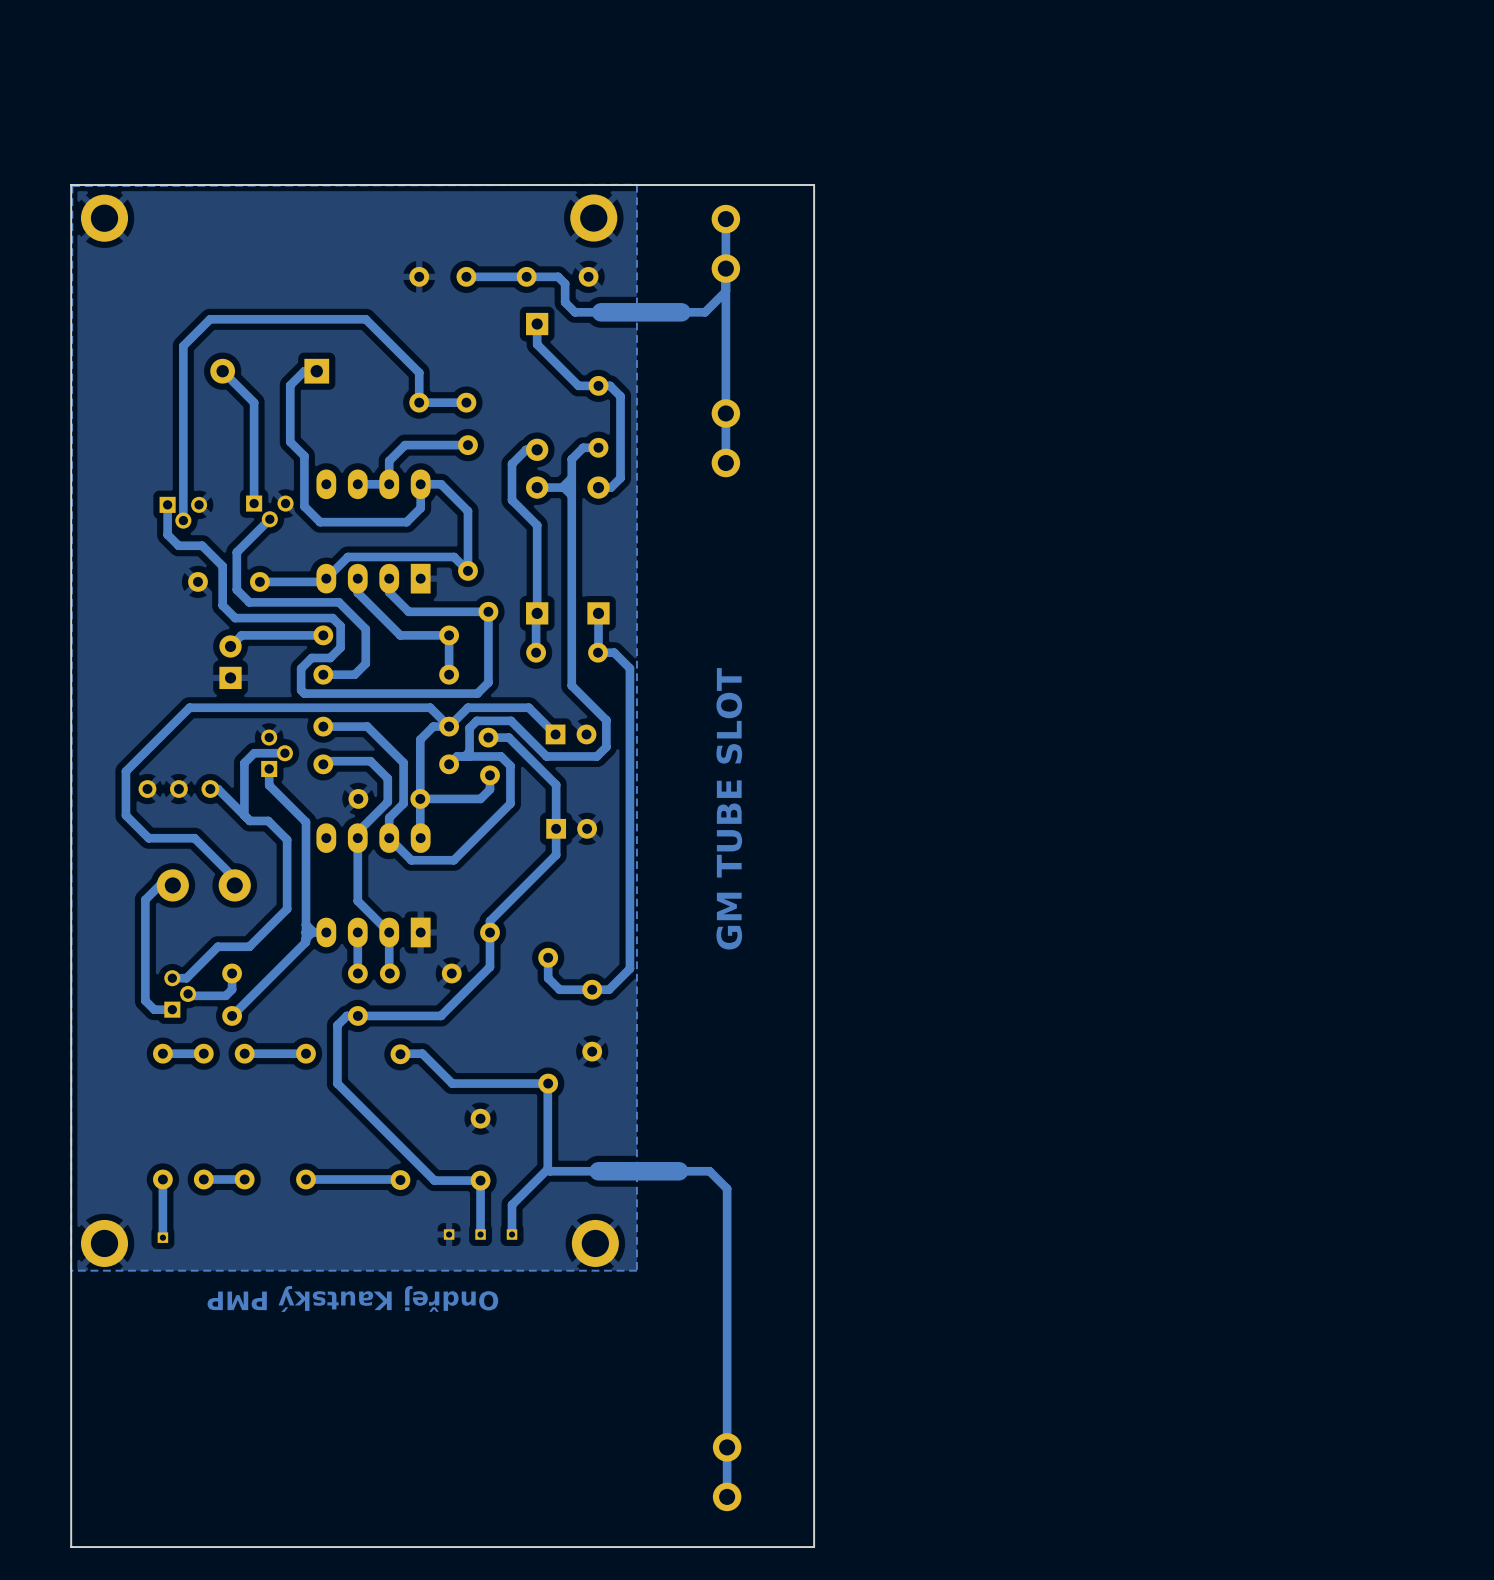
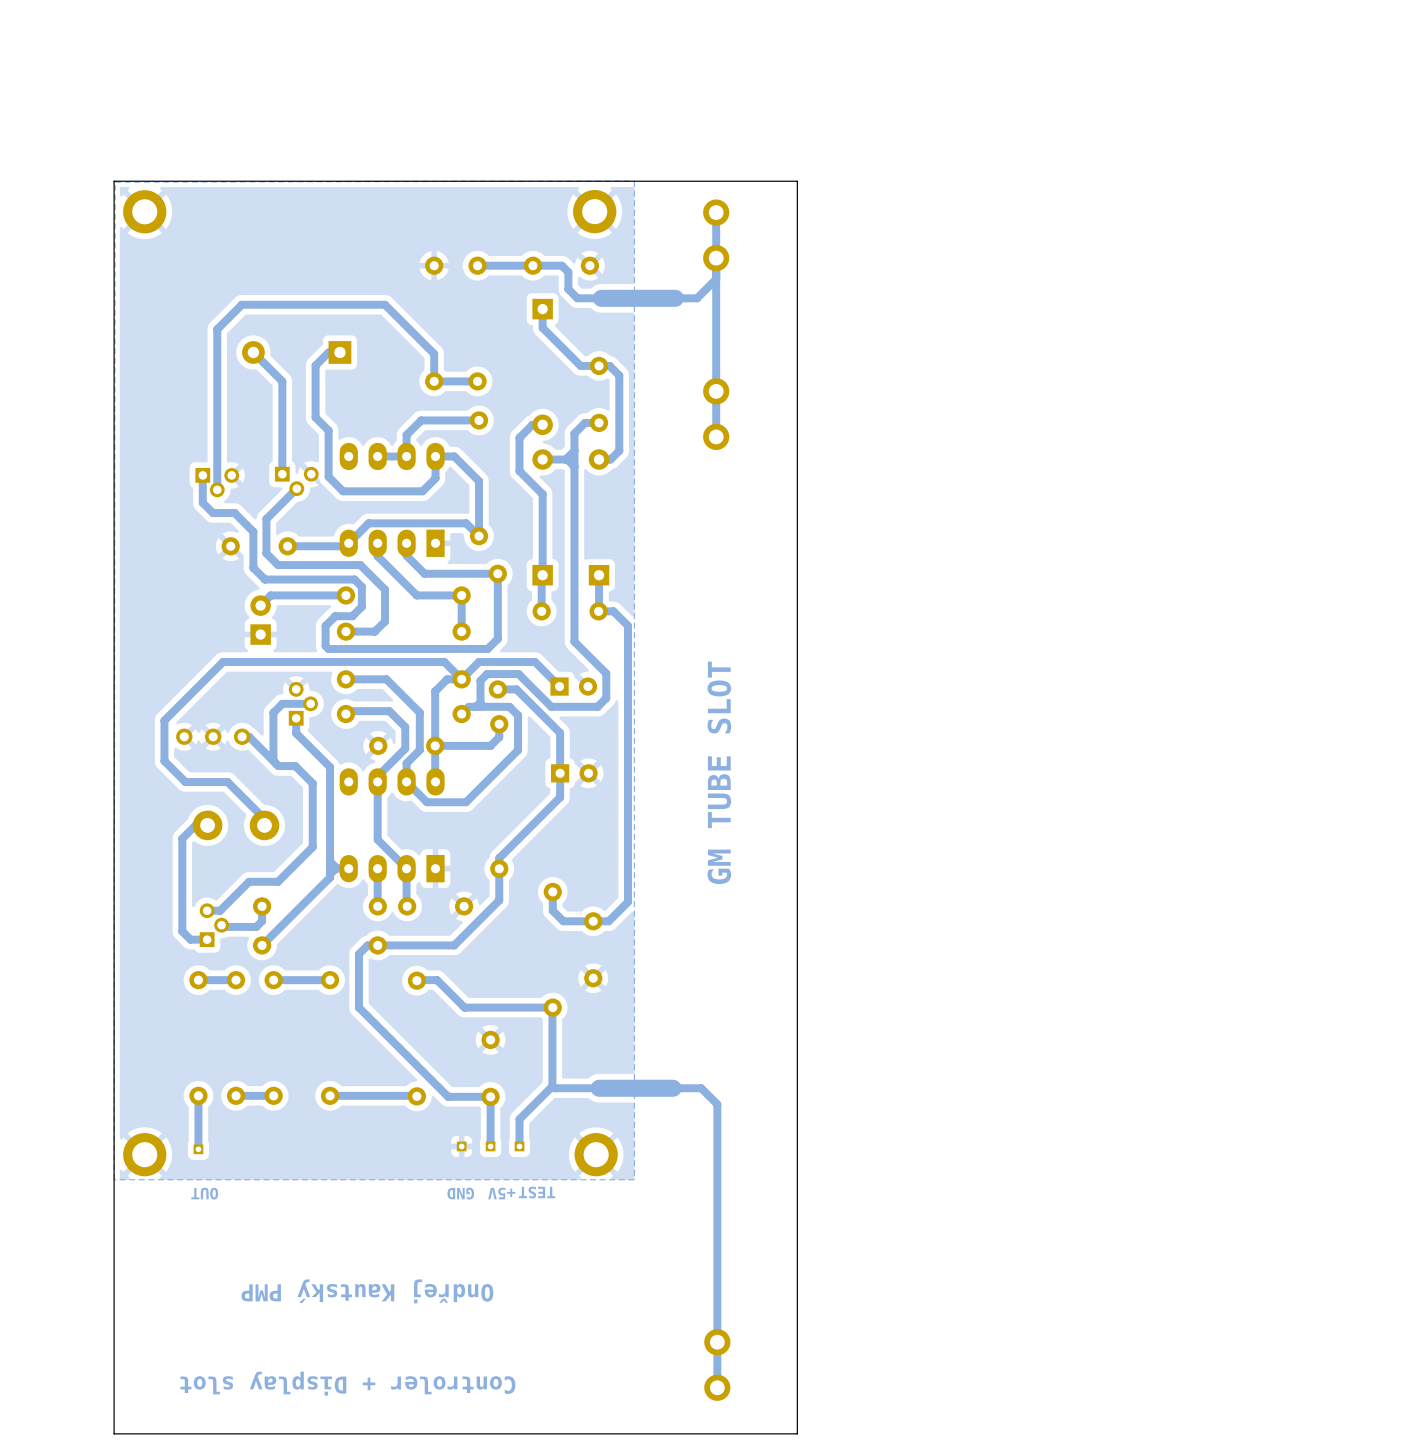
text: none -> TEST (537, 1192)
text: none -> OUT (204, 1193)
text: none -> GND (460, 1193)
text: none -> +5V (501, 1193)
text position: Ondřej Kautský PMP (352, 1298) -> Ondřej Kautský PMP (367, 1291)
text: none -> Controler + Display slot (347, 1383)

